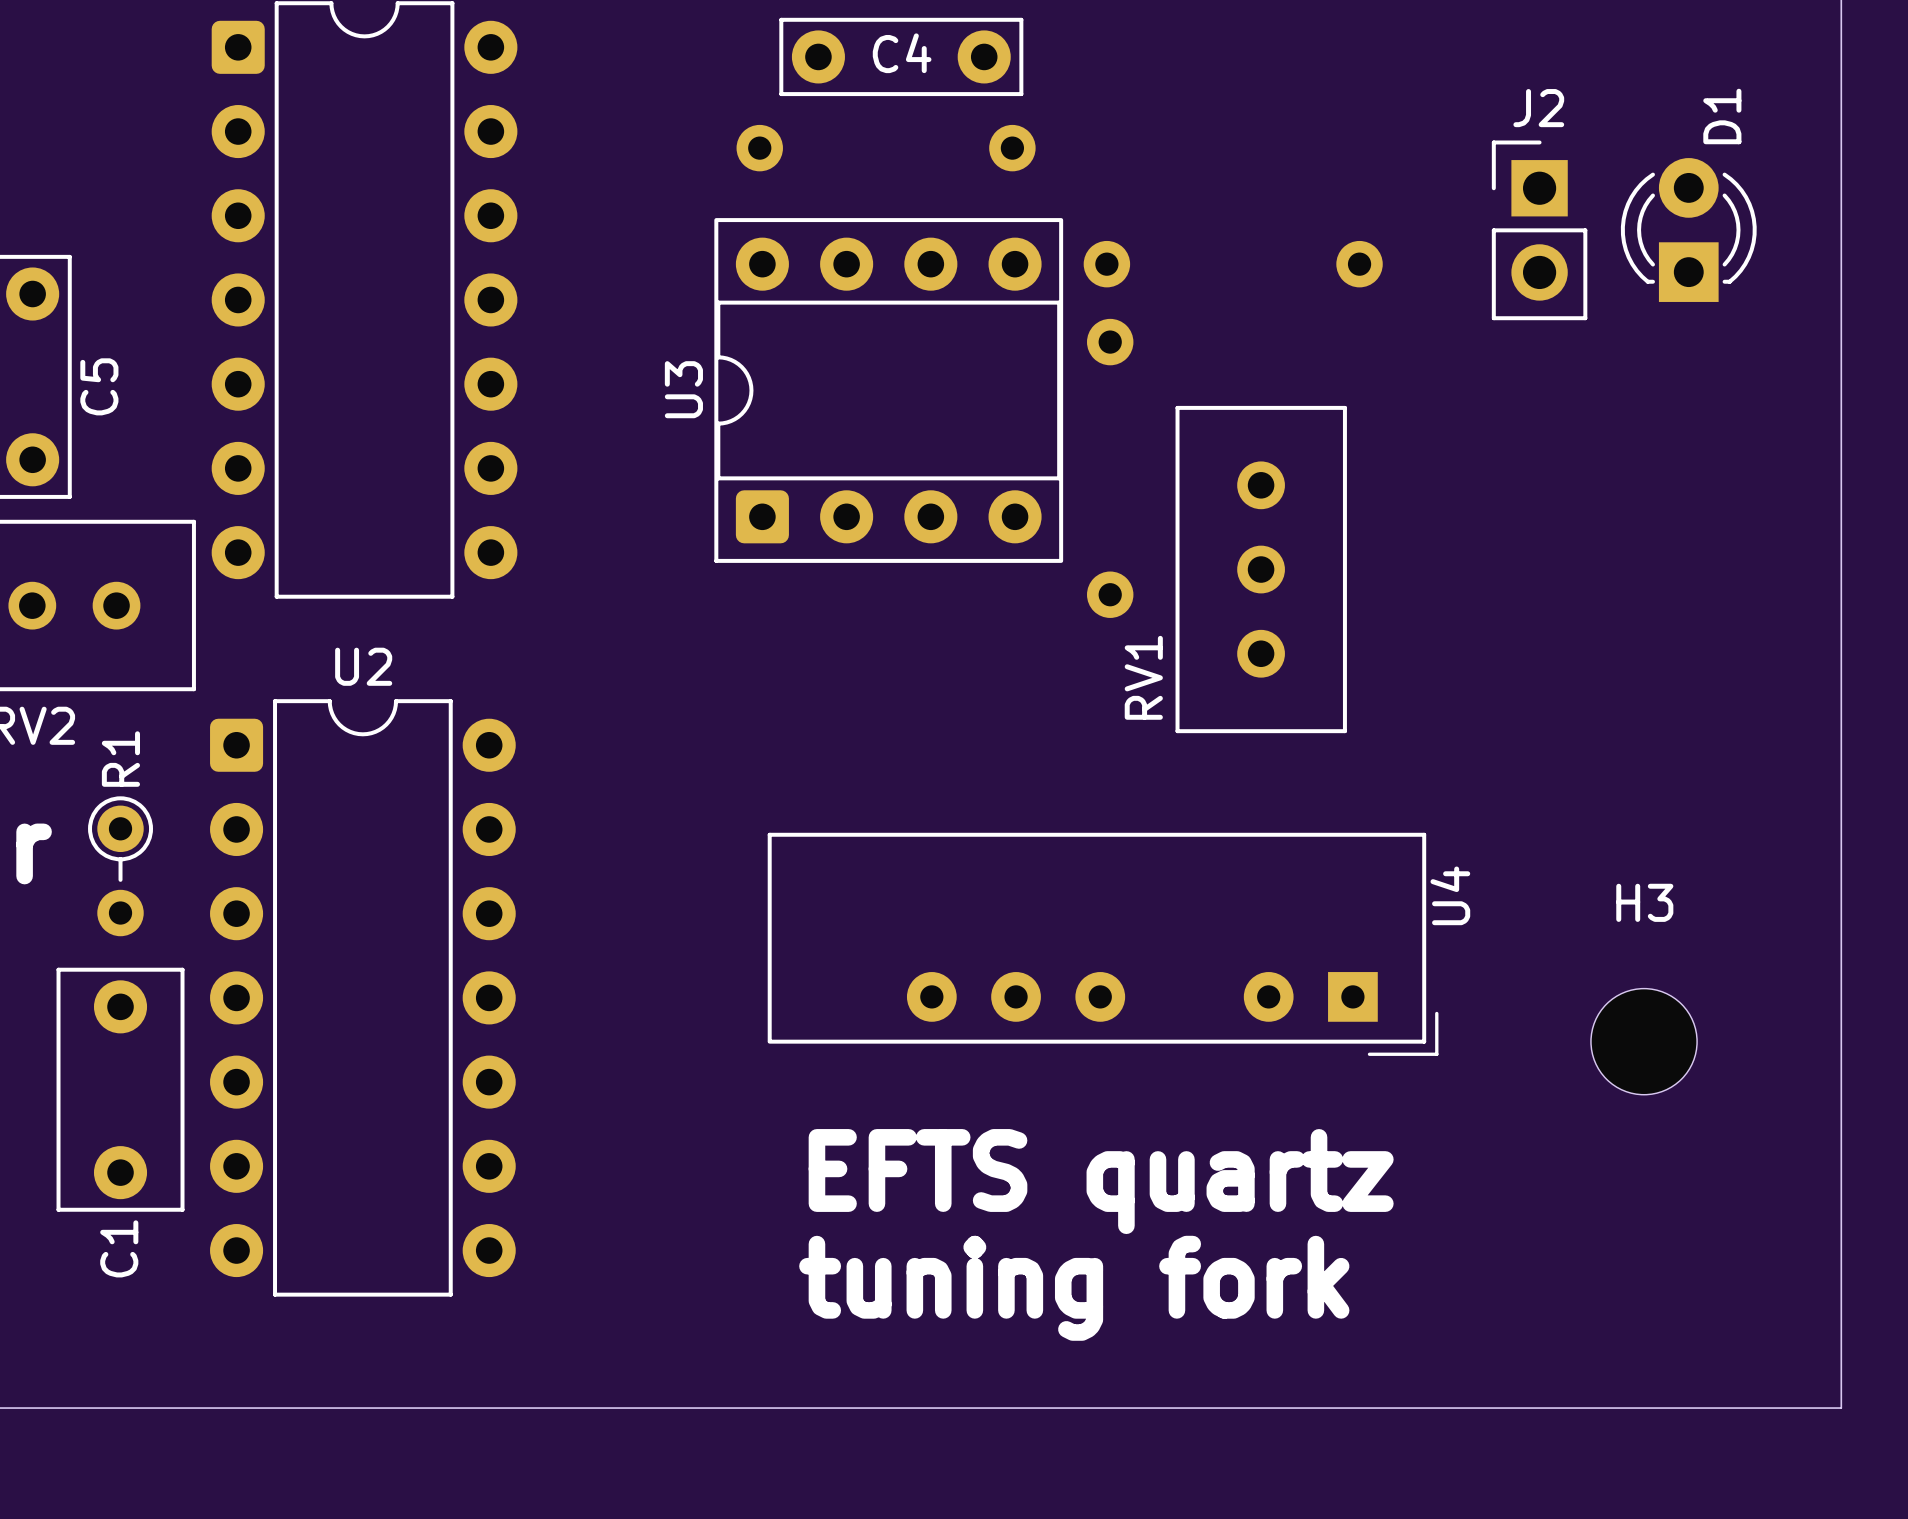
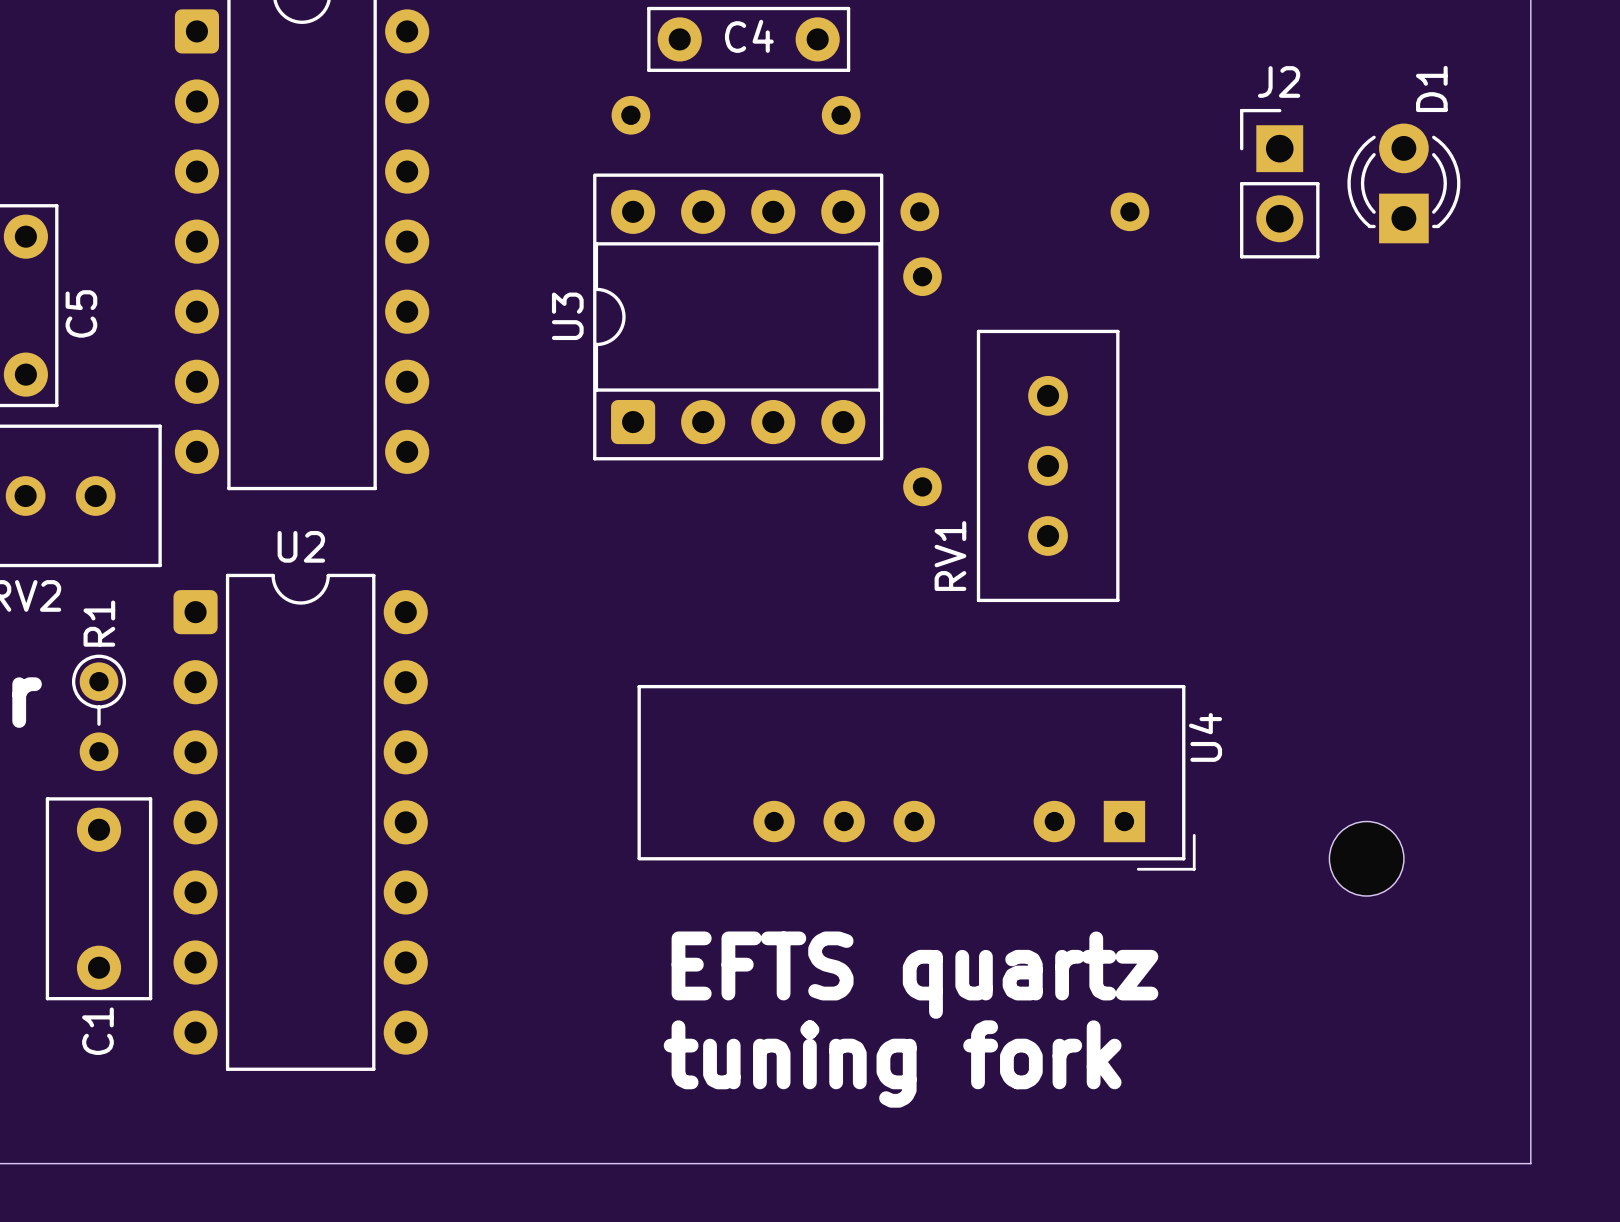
H3: (1644, 1041) -> none
part: none -> (1366, 858)

